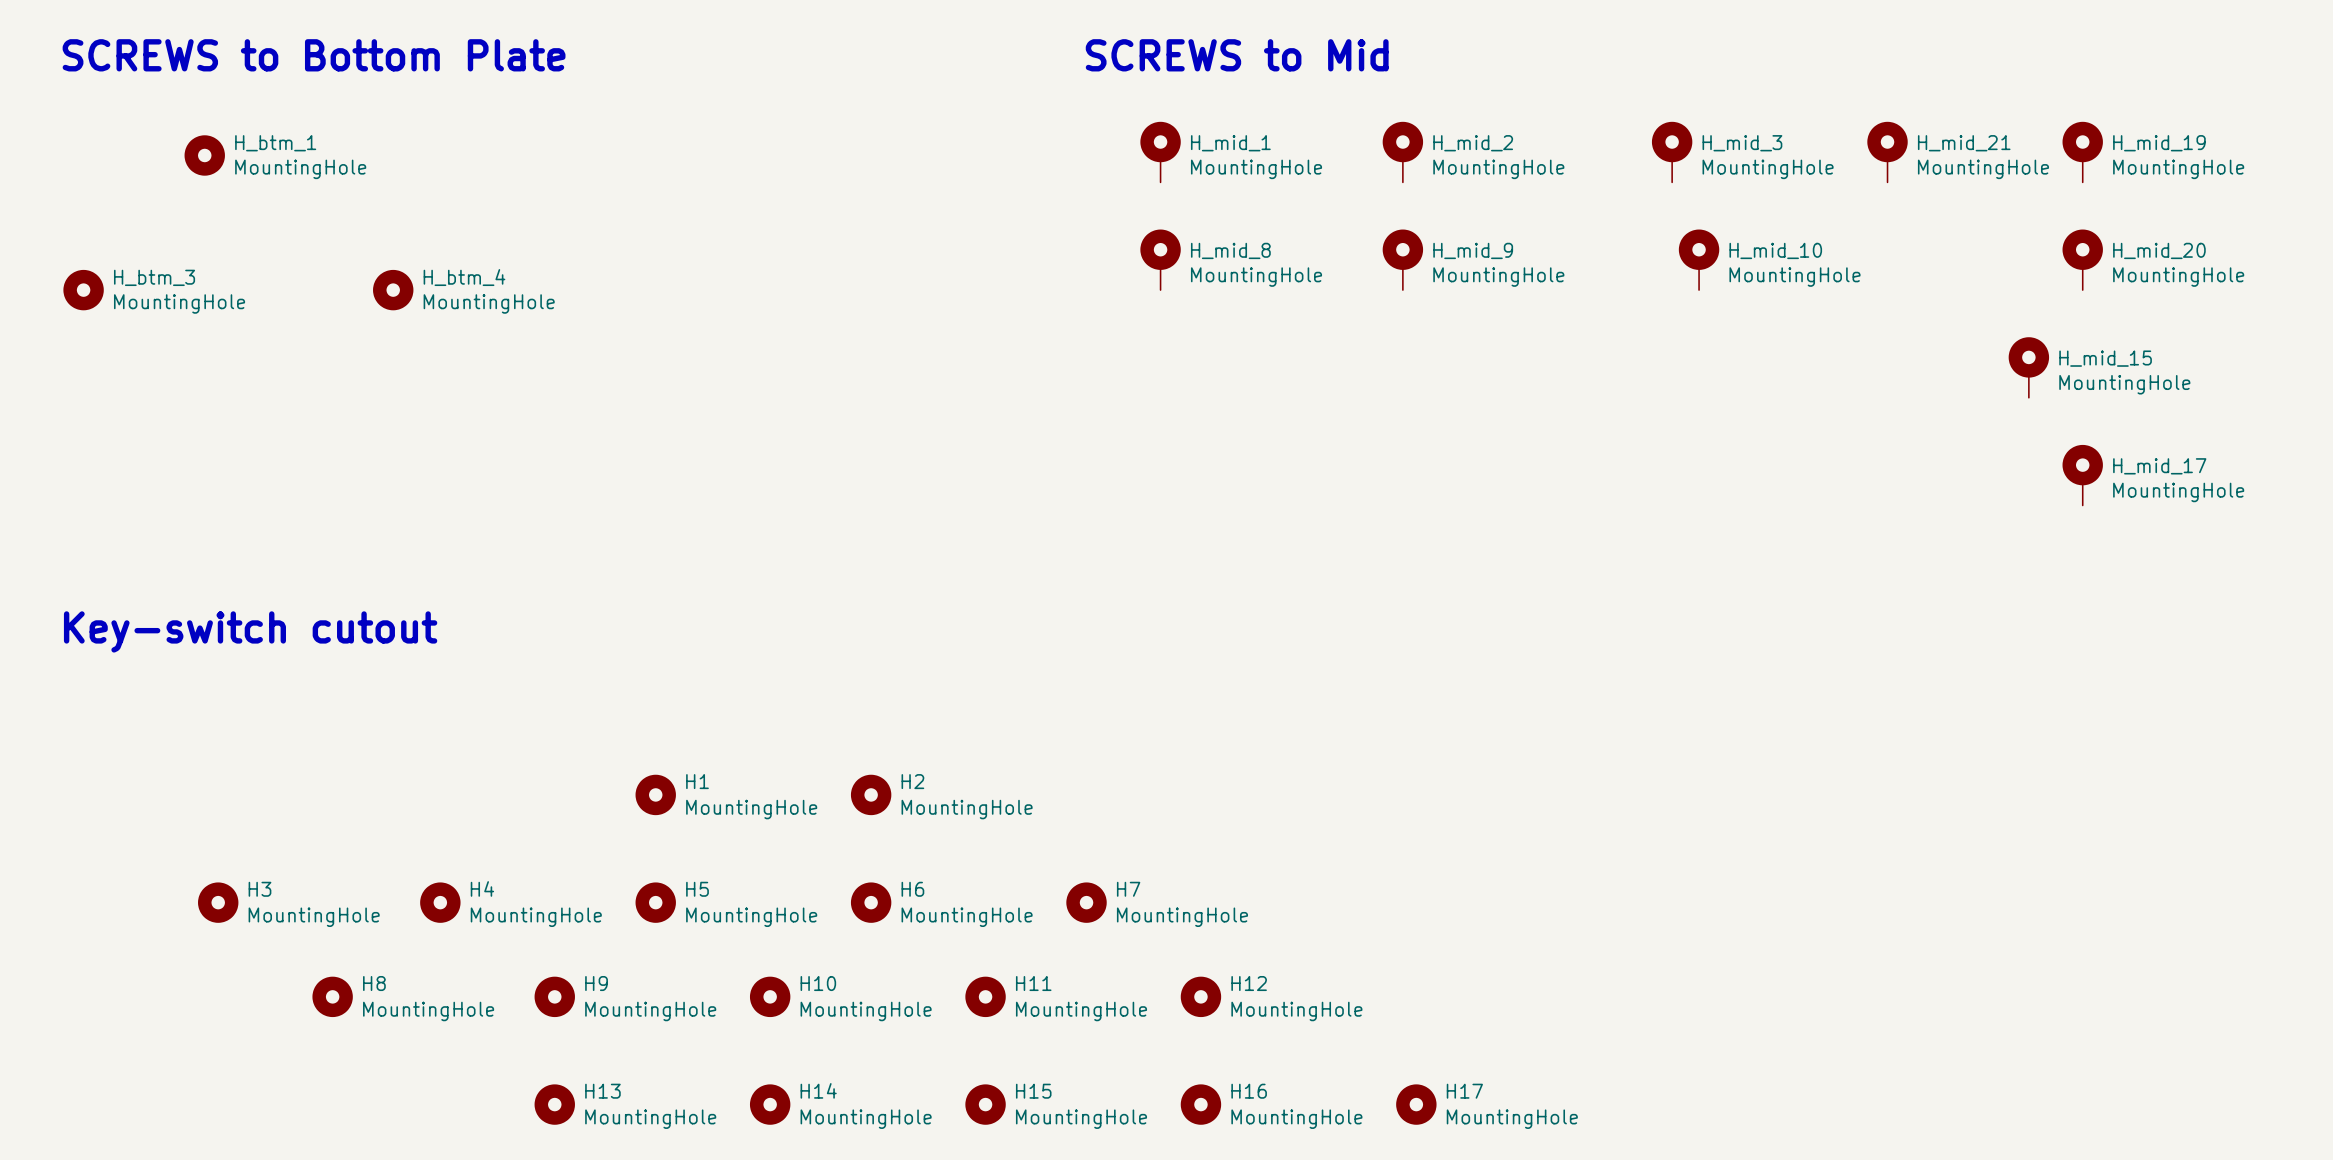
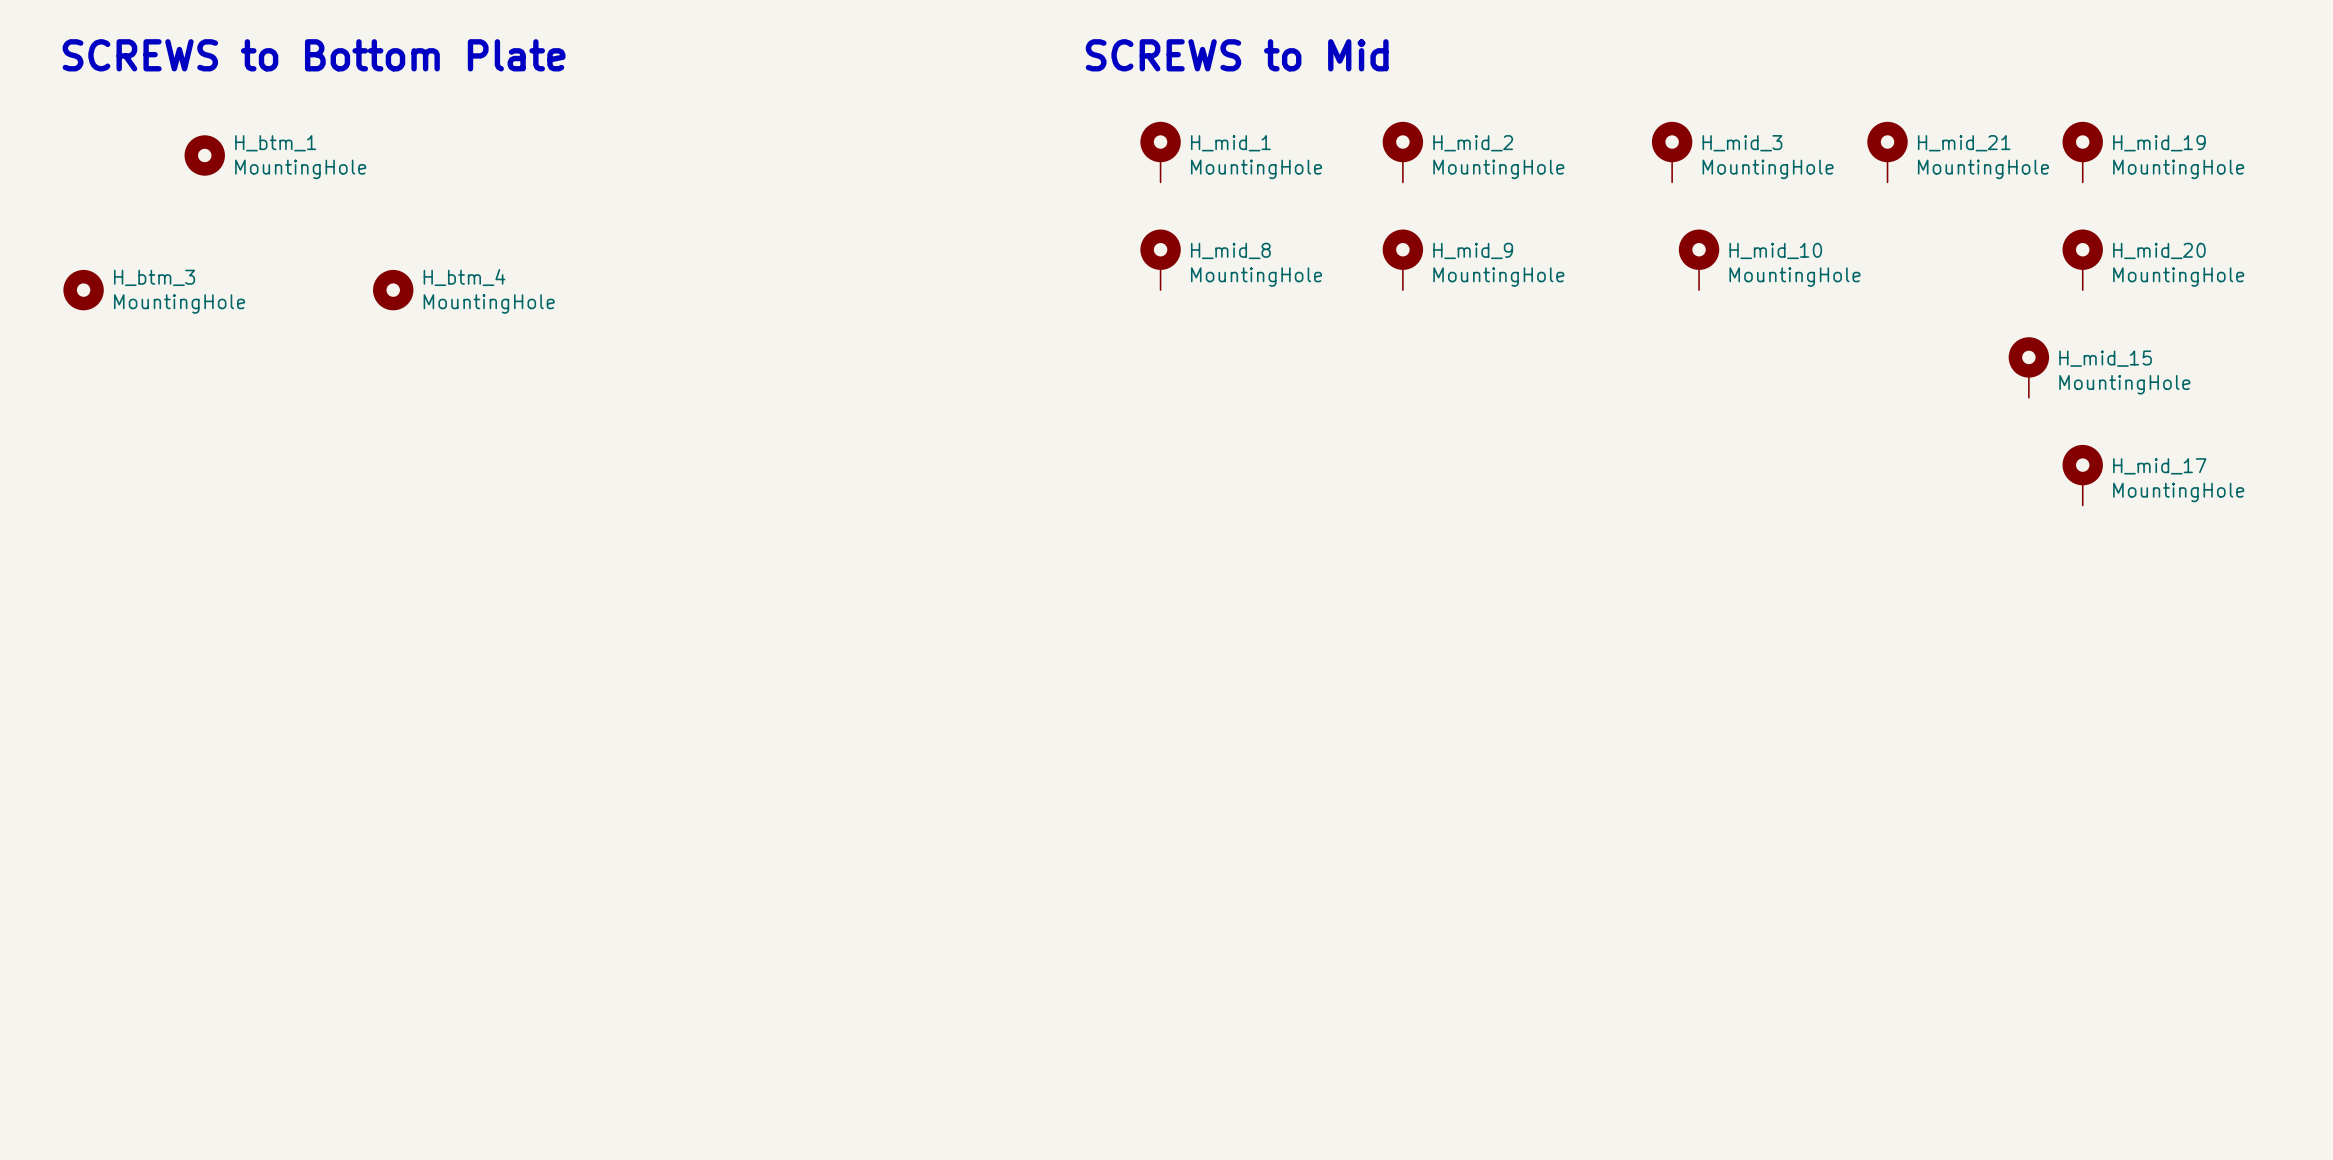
text: Key-switch cutout (250, 631) -> none
H1: MountingHole (655, 794) -> none
H2: MountingHole (871, 794) -> none
H3: MountingHole (218, 902) -> none
H4: MountingHole (440, 902) -> none
H5: MountingHole (655, 902) -> none
H6: MountingHole (871, 902) -> none
H7: MountingHole (1086, 902) -> none
H8: MountingHole (332, 996) -> none
H9: MountingHole (554, 996) -> none
H10: MountingHole (770, 996) -> none
H11: MountingHole (985, 996) -> none
H12: MountingHole (1200, 996) -> none
H13: MountingHole (554, 1104) -> none
H14: MountingHole (770, 1104) -> none
H15: MountingHole (985, 1104) -> none
H16: MountingHole (1200, 1104) -> none
H17: MountingHole (1416, 1104) -> none

